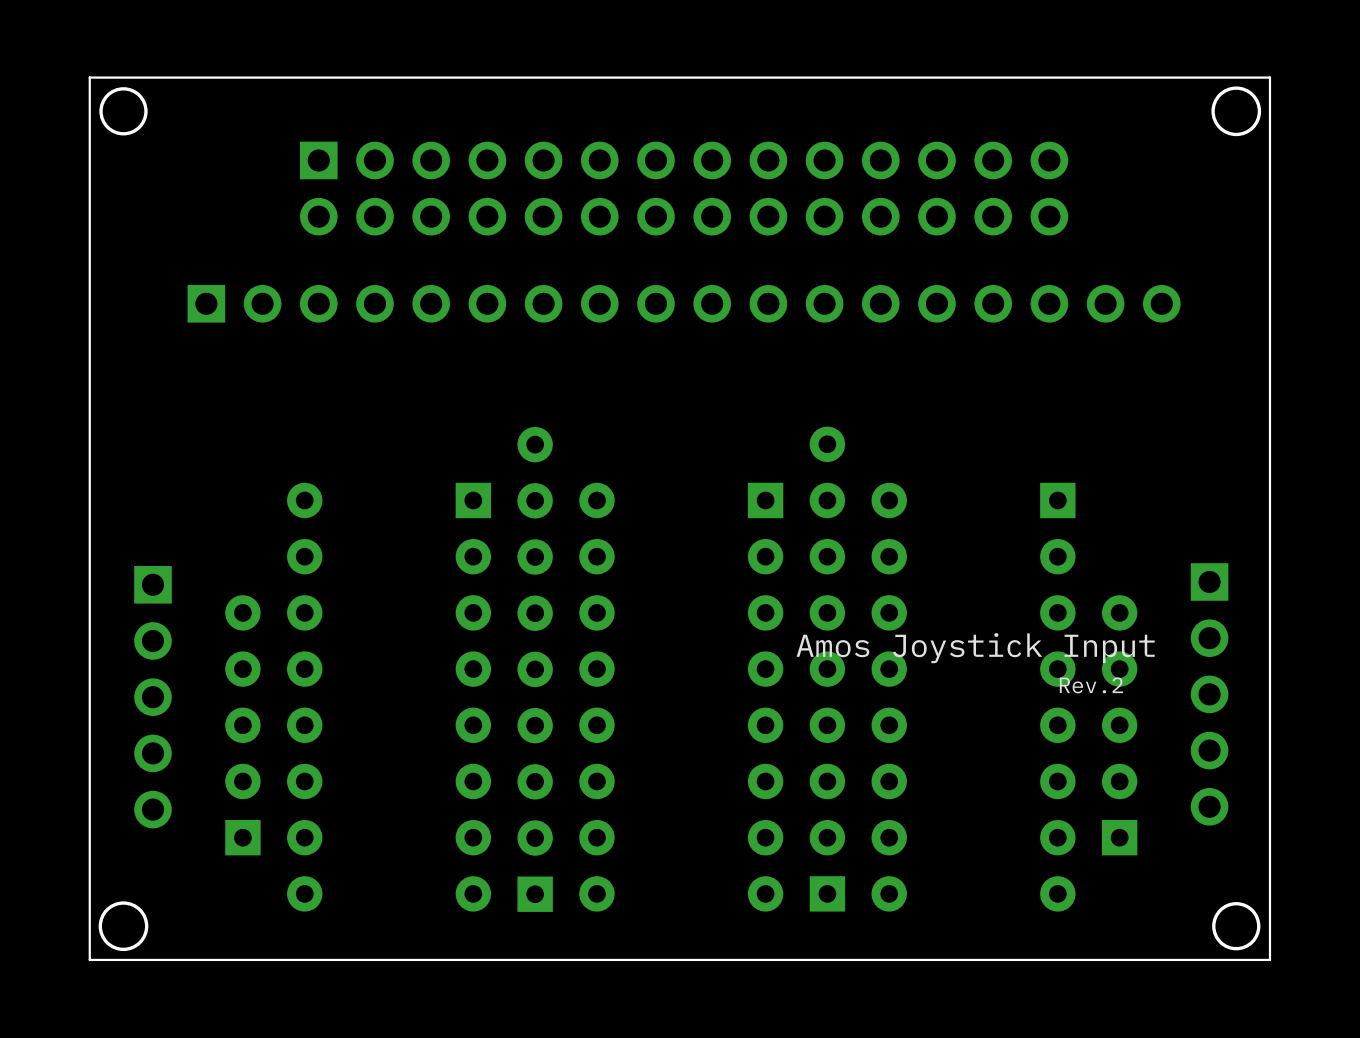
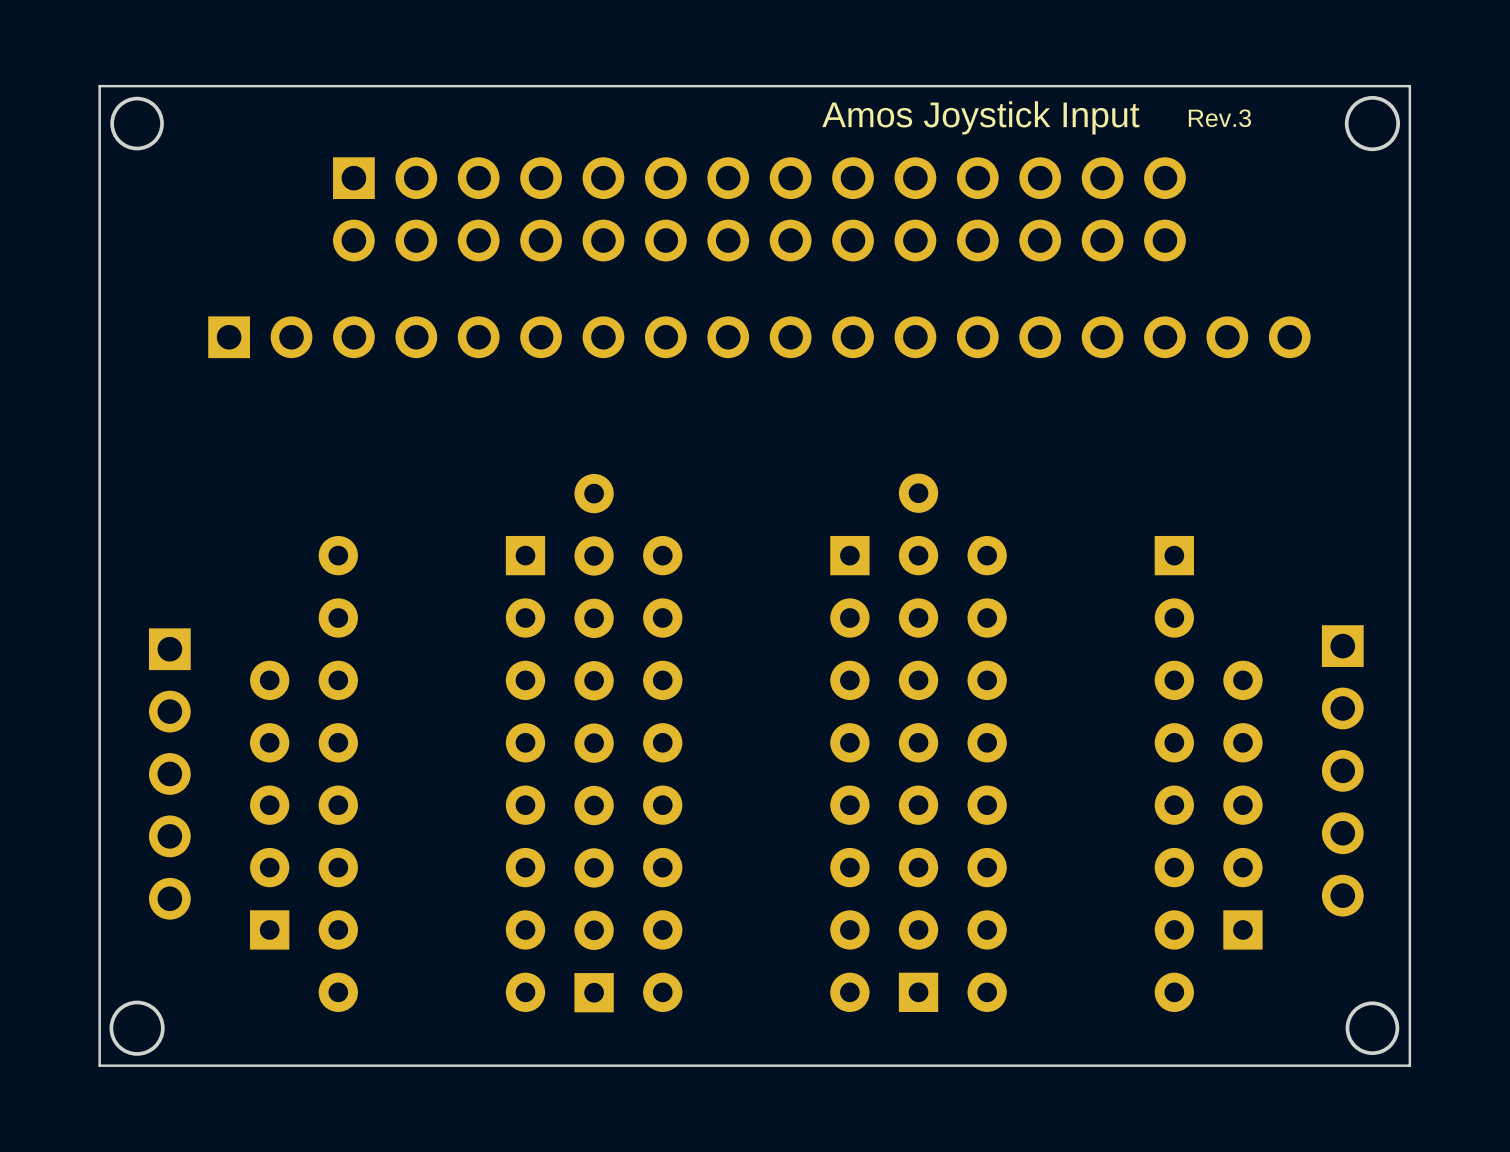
text: none -> Rev.3 (1219, 118)
text position: Amos Joystick Input (975, 648) -> Amos Joystick Input (980, 117)
text: Rev.2 (1091, 685) -> none

